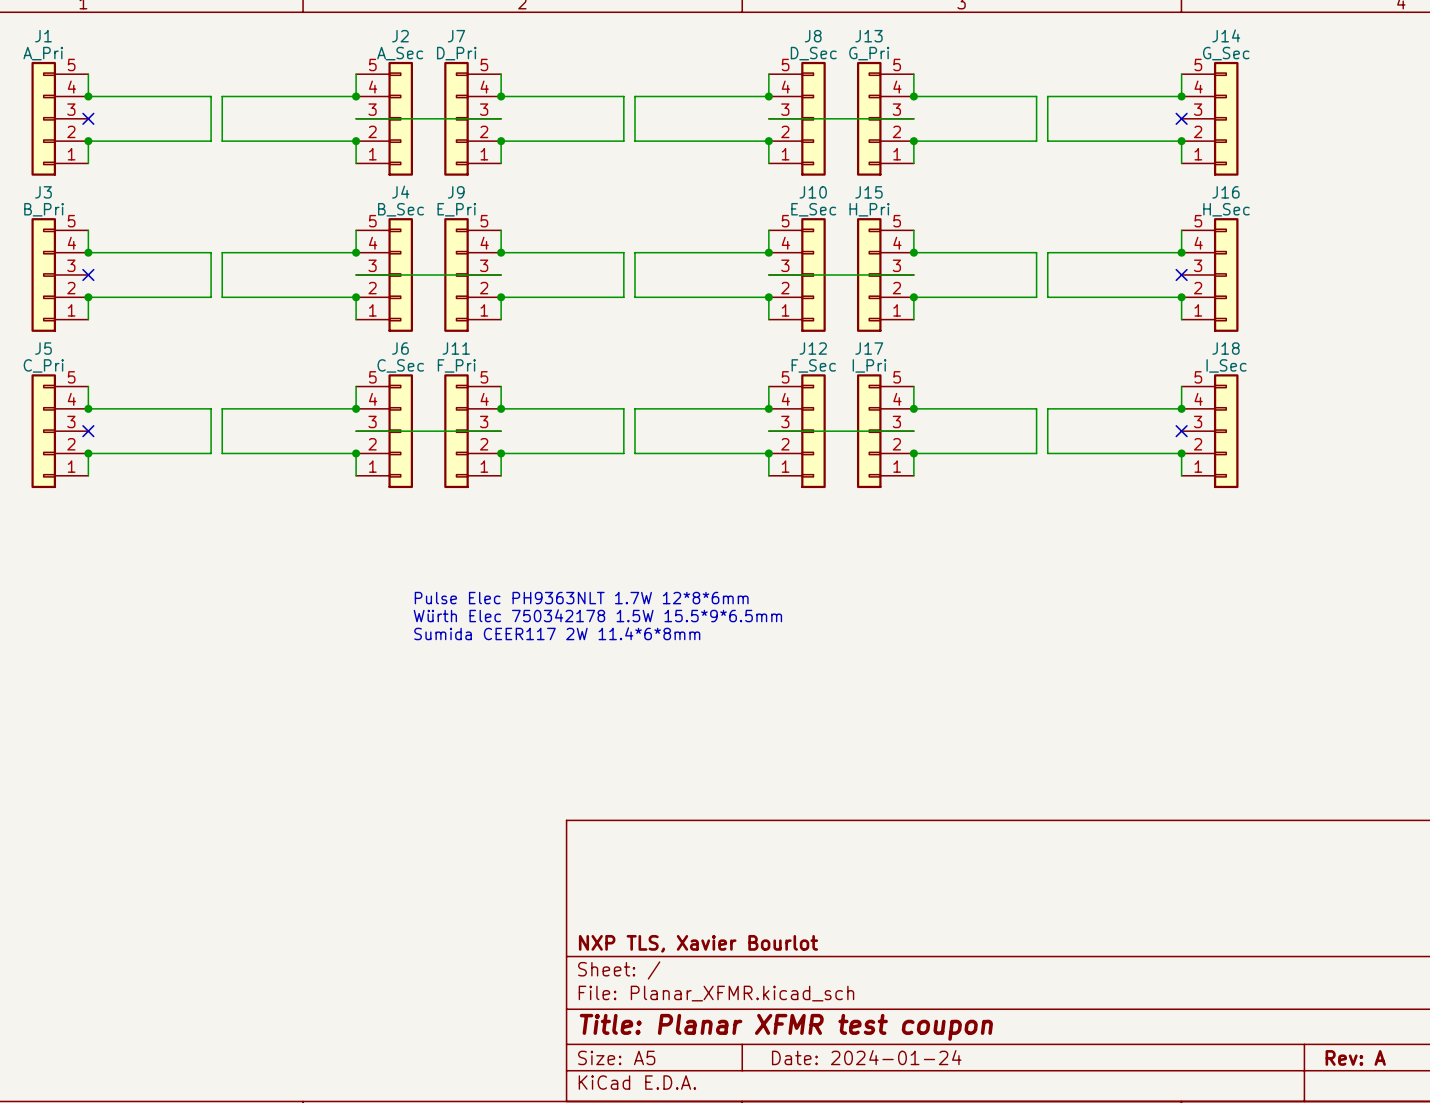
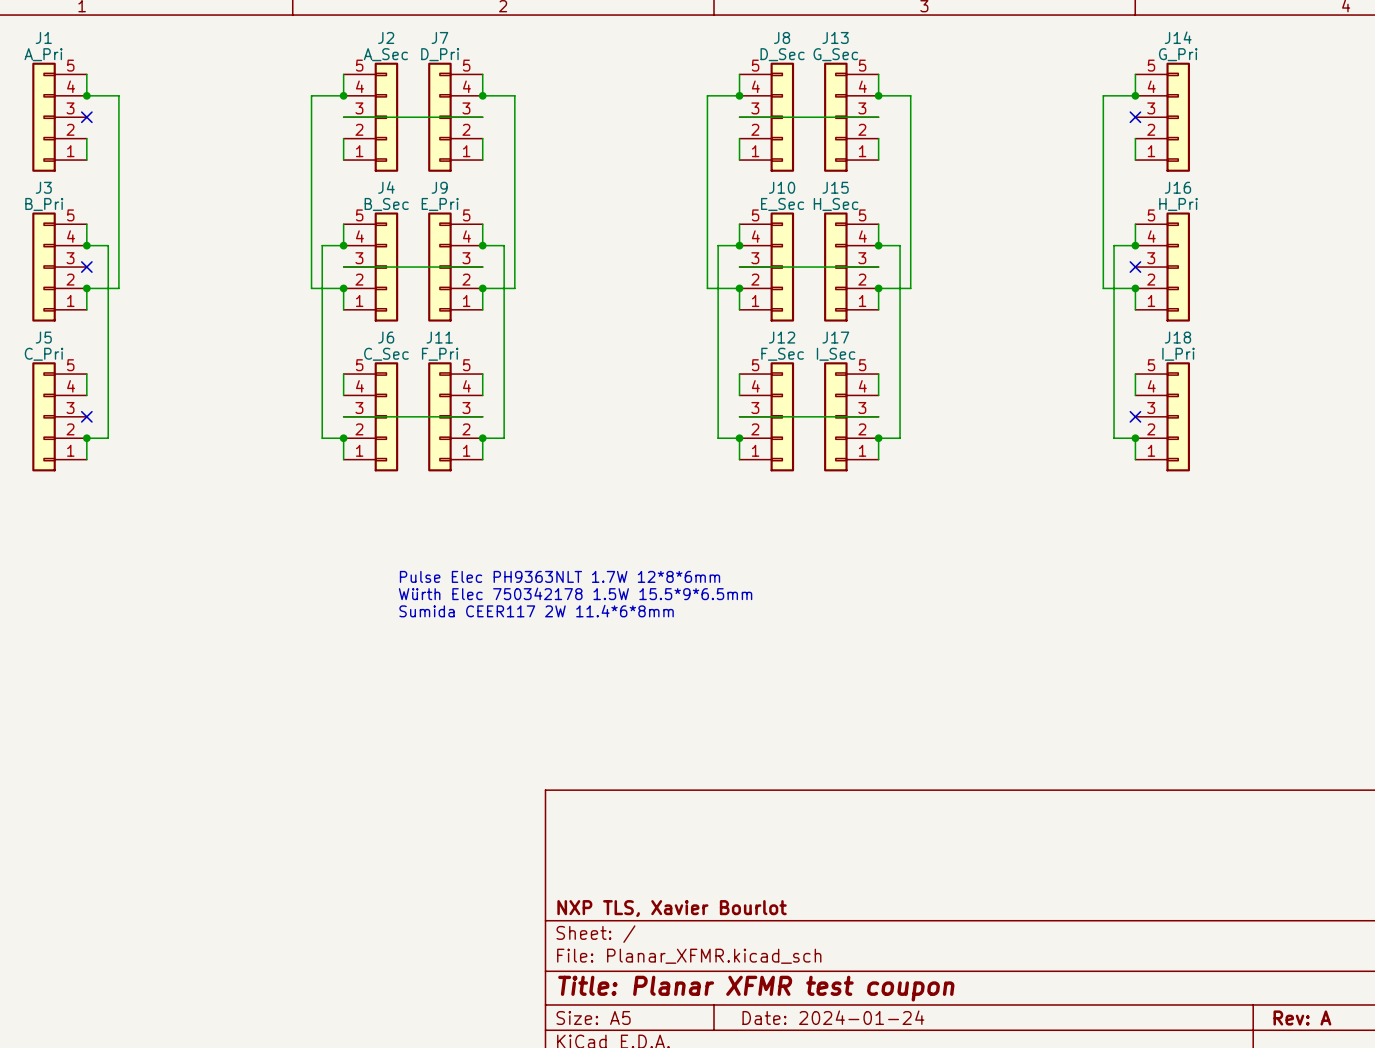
J13 value: G_Pri (869, 53) -> G_Sec (835, 54)
J14 value: G_Sec (1226, 53) -> G_Pri (1178, 54)
wire: (121, 96) (211, 96) (211, 141) (88, 141) -> (118, 95) (118, 288)
wire: (322, 96) (222, 96) (222, 141) (356, 141) -> (311, 95) (311, 288)
wire: (534, 96) (623, 96) (623, 141) (501, 141) -> (514, 95) (514, 288)
wire: (735, 96) (634, 96) (634, 141) (768, 141) -> (707, 95) (707, 288)
wire: (947, 96) (1036, 96) (1036, 141) (913, 141) -> (910, 95) (910, 288)
wire: (1148, 96) (1047, 96) (1047, 141) (1181, 141) -> (1103, 95) (1103, 288)
junction: (88, 141) -> none
junction: (356, 141) -> none
junction: (501, 141) -> none
junction: (768, 141) -> none
junction: (913, 141) -> none
junction: (1181, 141) -> none
J15 value: H_Pri (869, 209) -> H_Sec (836, 204)
J16 value: H_Sec (1226, 209) -> H_Pri (1178, 204)
wire: (110, 252) (211, 252) (211, 297) (121, 297) -> (108, 245) (108, 438)
wire: (333, 252) (222, 252) (222, 297) (322, 297) -> (322, 245) (322, 438)
wire: (523, 252) (623, 252) (623, 297) (534, 297) -> (504, 245) (504, 438)
wire: (746, 252) (634, 252) (634, 297) (735, 297) -> (718, 245) (718, 438)
wire: (936, 252) (1036, 252) (1036, 297) (947, 297) -> (900, 245) (900, 438)
wire: (1159, 252) (1047, 252) (1047, 297) (1148, 297) -> (1114, 245) (1114, 438)
J17 value: I_Pri (869, 365) -> I_Sec (836, 354)
J18 value: I_Sec (1226, 365) -> I_Pri (1178, 354)
wire: (88, 408) (211, 408) (211, 453) (110, 453) -> none
junction: (88, 408) -> none
wire: (356, 408) (222, 408) (222, 453) (333, 453) -> none
junction: (356, 408) -> none
wire: (501, 408) (623, 408) (623, 453) (523, 453) -> none
junction: (501, 408) -> none
wire: (768, 408) (634, 408) (634, 453) (746, 453) -> none
junction: (768, 408) -> none
wire: (913, 408) (1036, 408) (1036, 453) (936, 453) -> none
junction: (913, 408) -> none
wire: (1181, 408) (1047, 408) (1047, 453) (1159, 453) -> none
junction: (1181, 408) -> none

